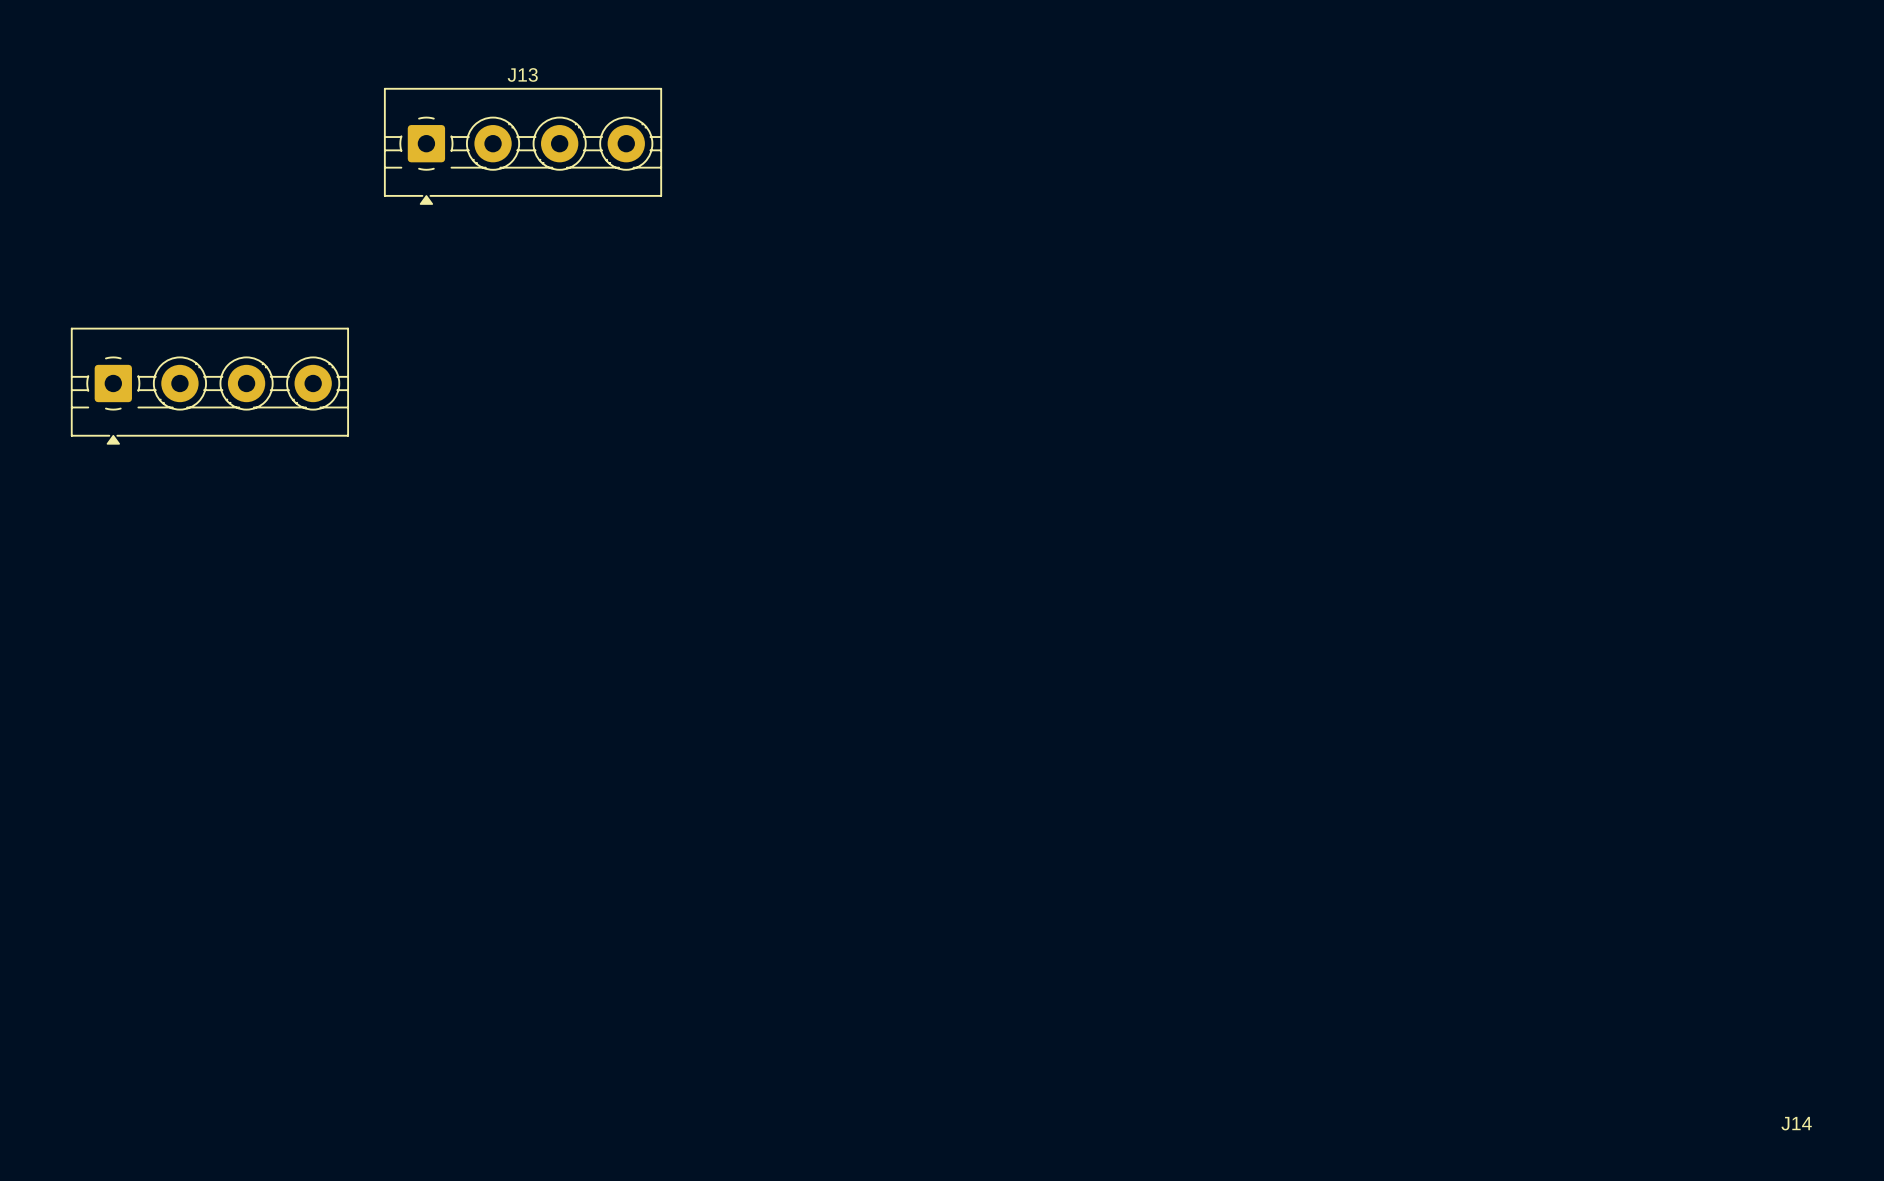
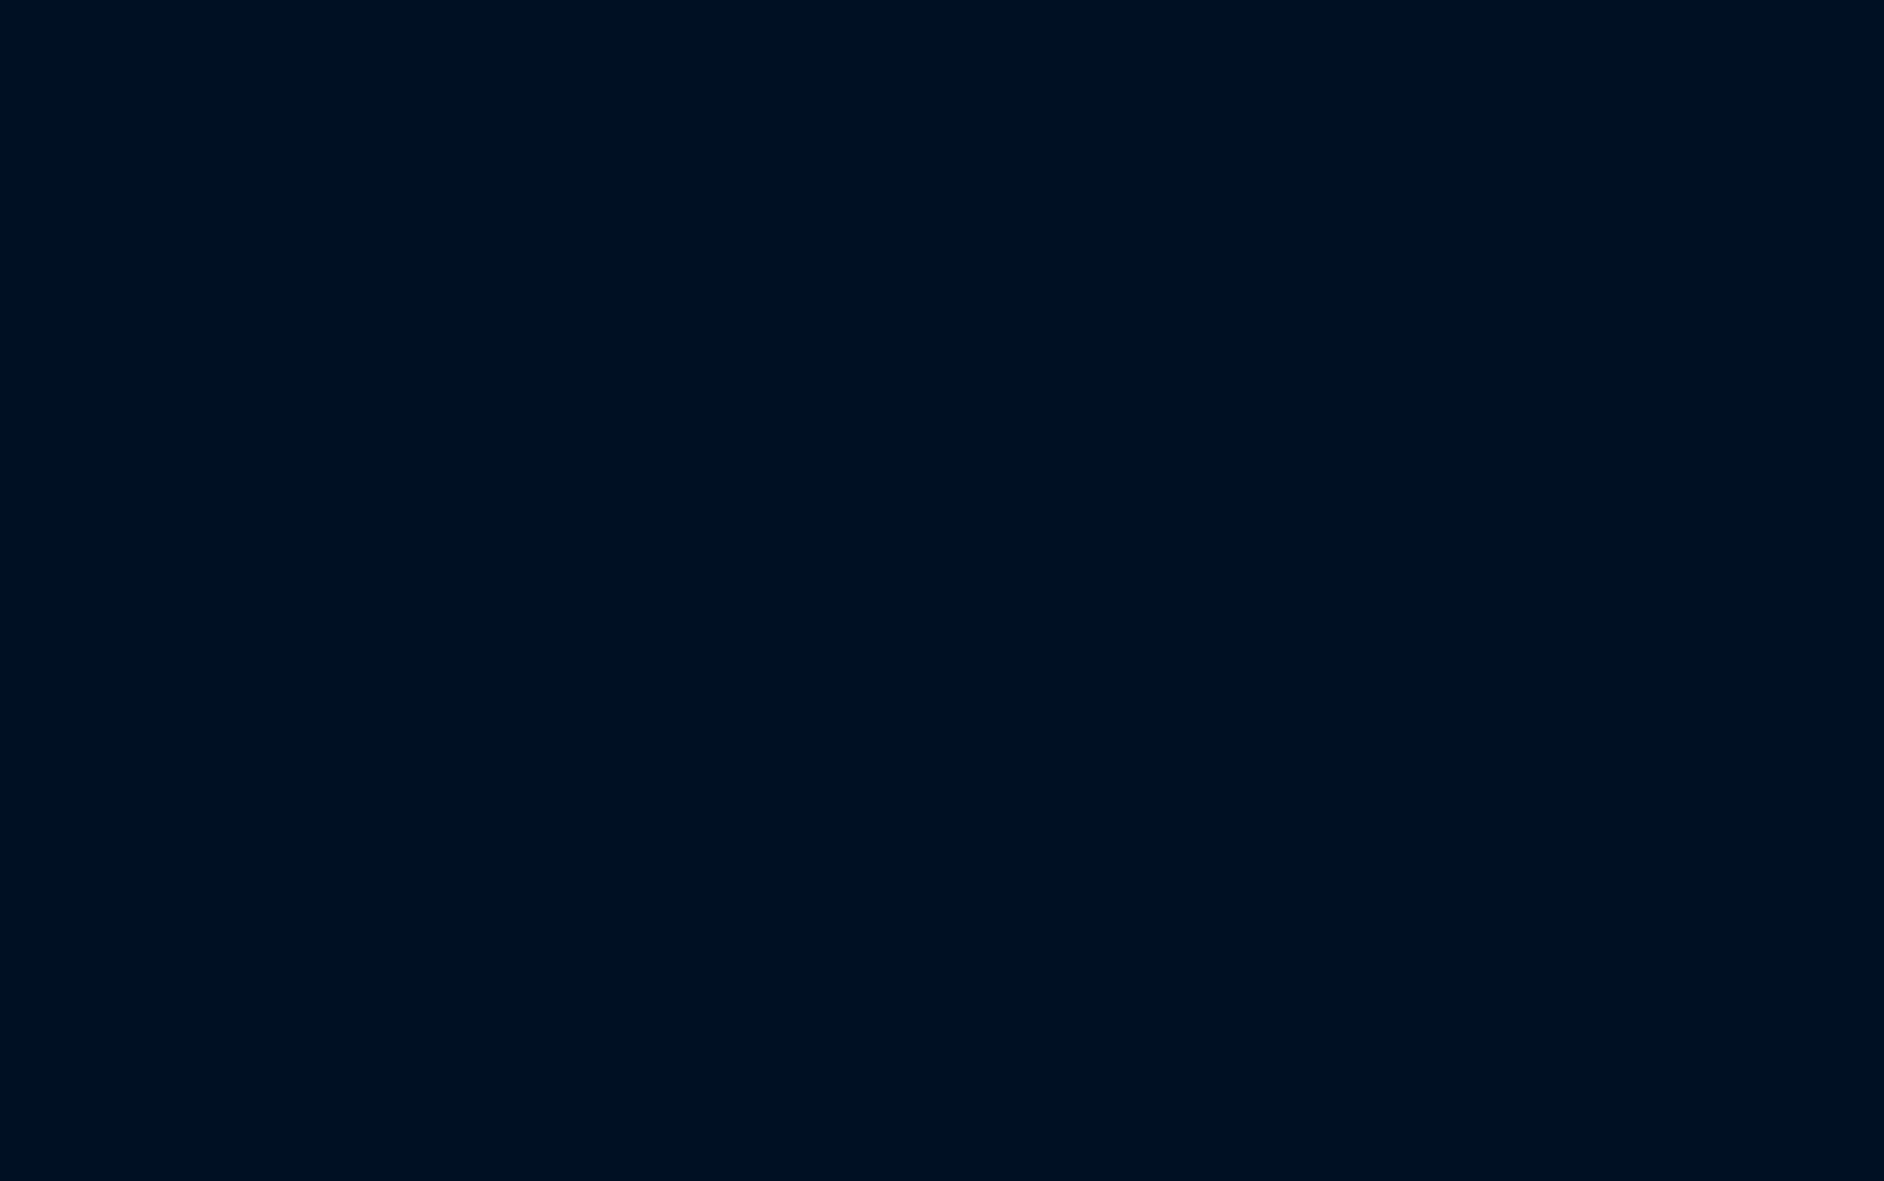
J13: (523, 146) -> none
J14: (209, 386) -> none

